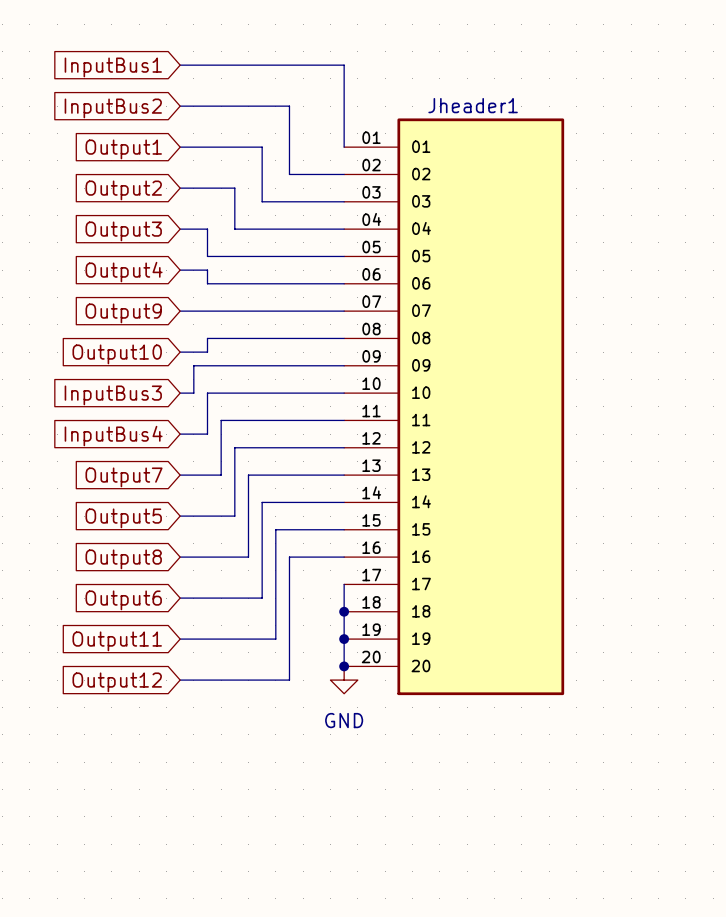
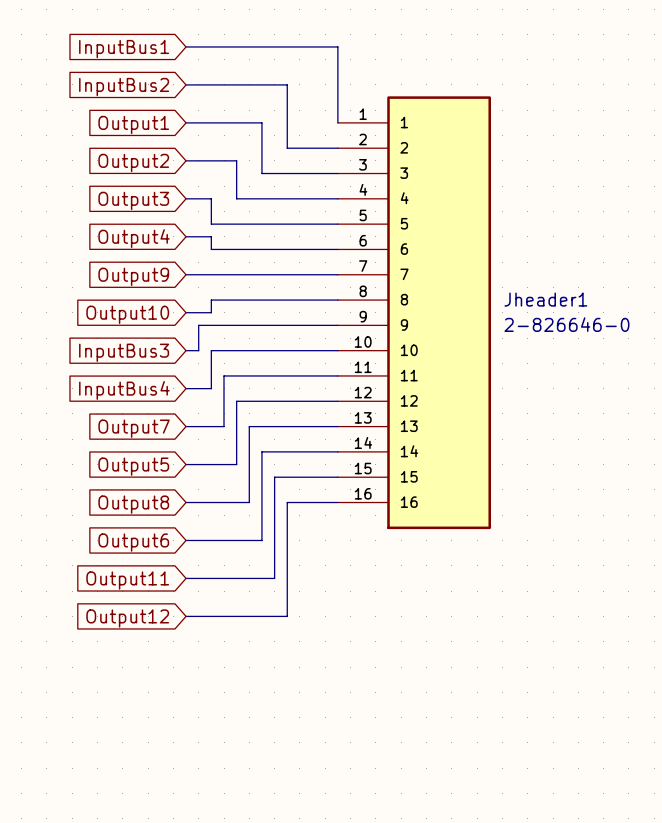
Jheader1 name position: Jheader1 (473, 105) -> Jheader1 (545, 299)
Jheader1 symbol: [344, 118, 565, 696] -> [337, 96, 491, 530]
Jheader1 value: none -> 2-826646-0 (566, 324)
wire: (344, 584) (344, 666) -> none
junction: (344, 611) -> none
junction: (344, 639) -> none
junction: (344, 666) -> none
power symbol: GND (344, 680) -> none

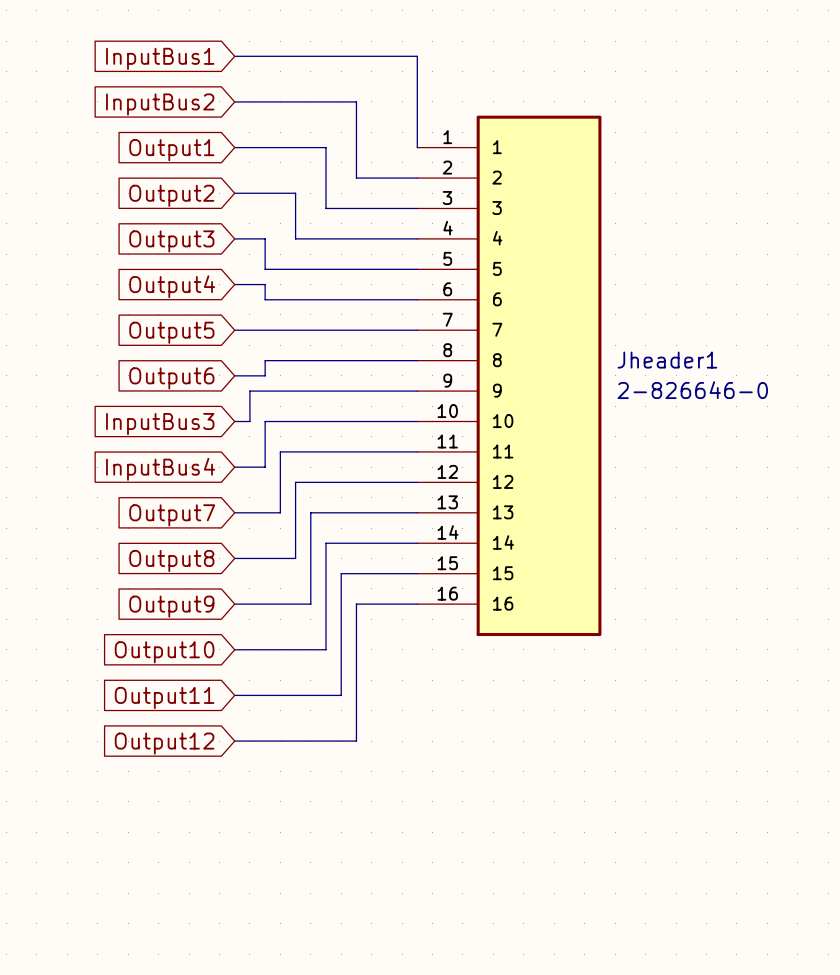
global label: Output9 (133, 276) -> Output5 (171, 332)
global label: Output10 (127, 314) -> Output6 (171, 378)
global label: Output5 (133, 466) -> Output8 (171, 560)
global label: Output8 (133, 504) -> Output9 (171, 606)
global label: Output6 (133, 542) -> Output10 (164, 652)

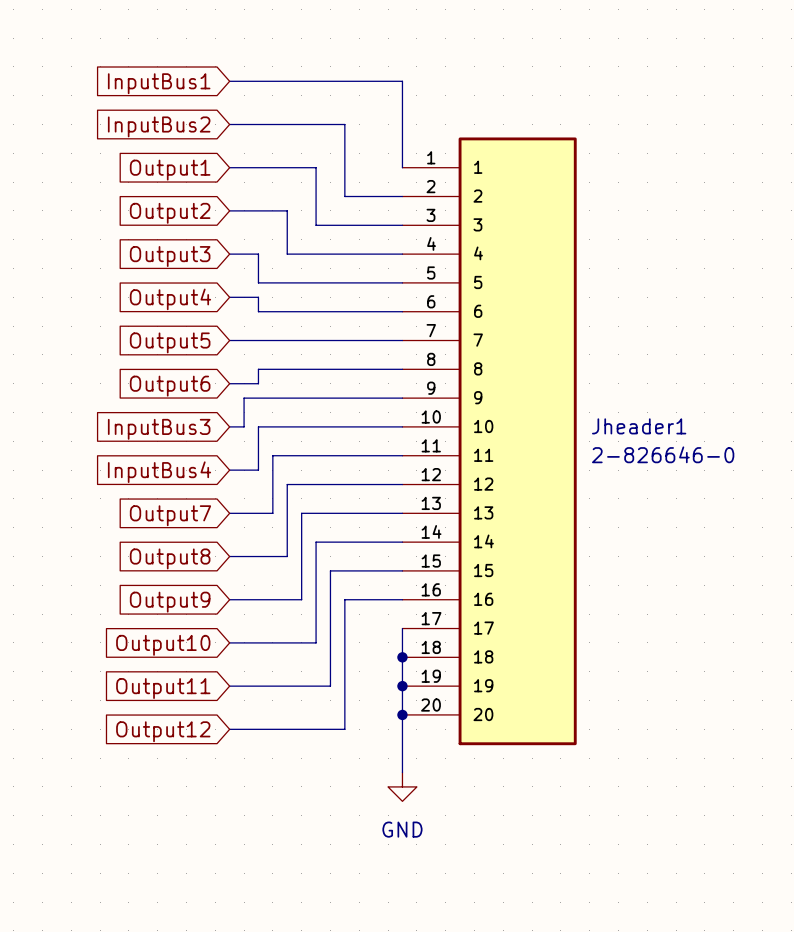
Jheader1 symbol: [417, 115, 602, 637] -> [402, 137, 577, 746]
wire: none -> (402, 628) (402, 772)
junction: none -> (402, 657)
junction: none -> (402, 686)
junction: none -> (402, 714)
power symbol: none -> GND (402, 786)

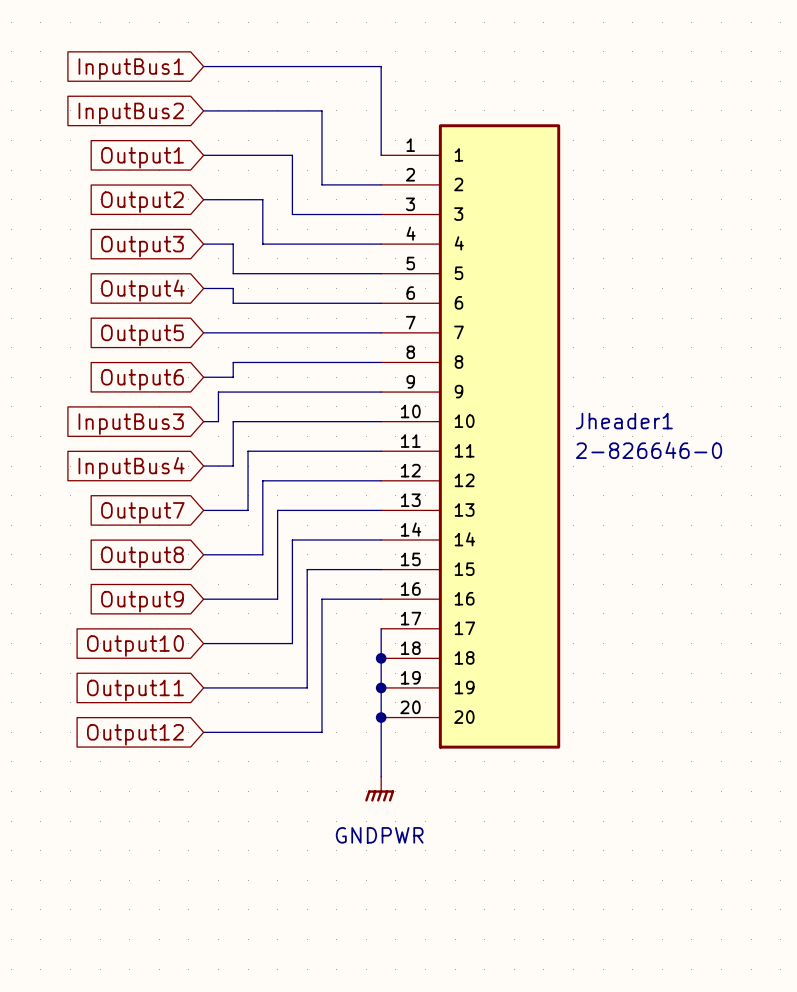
power symbol: GND (402, 786) -> GNDPWR (379, 789)

